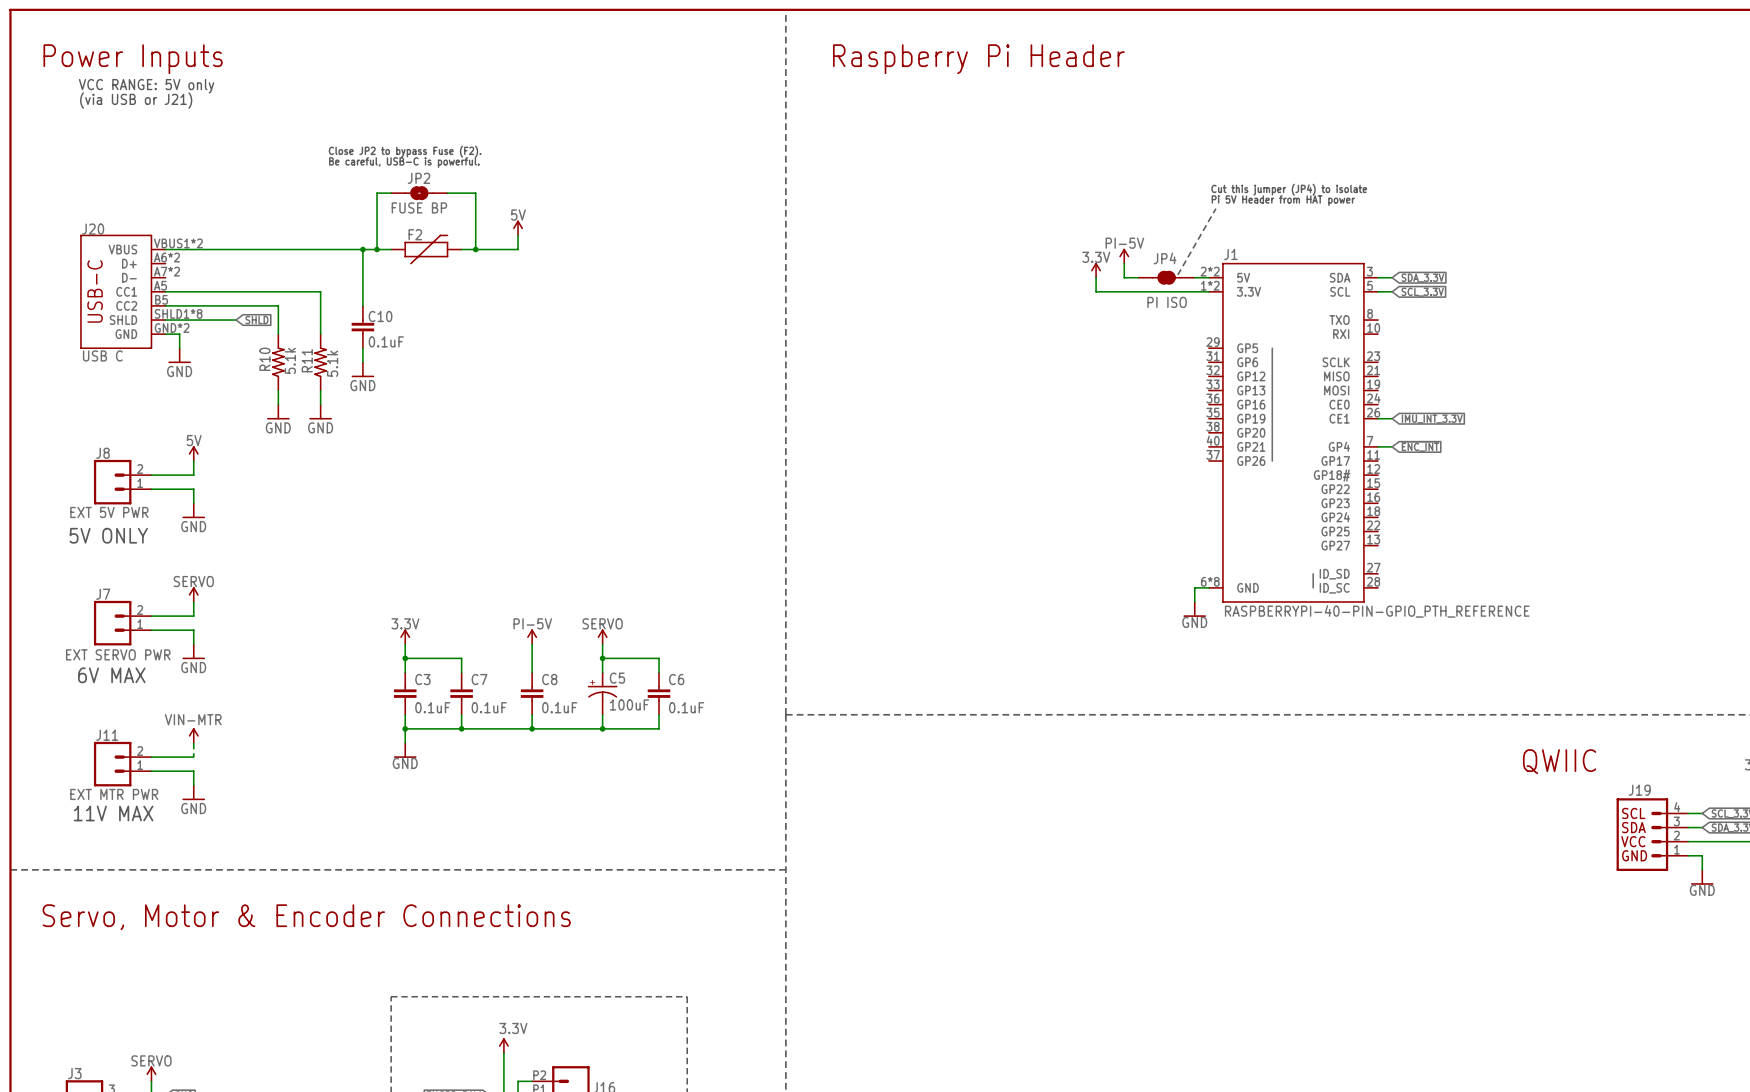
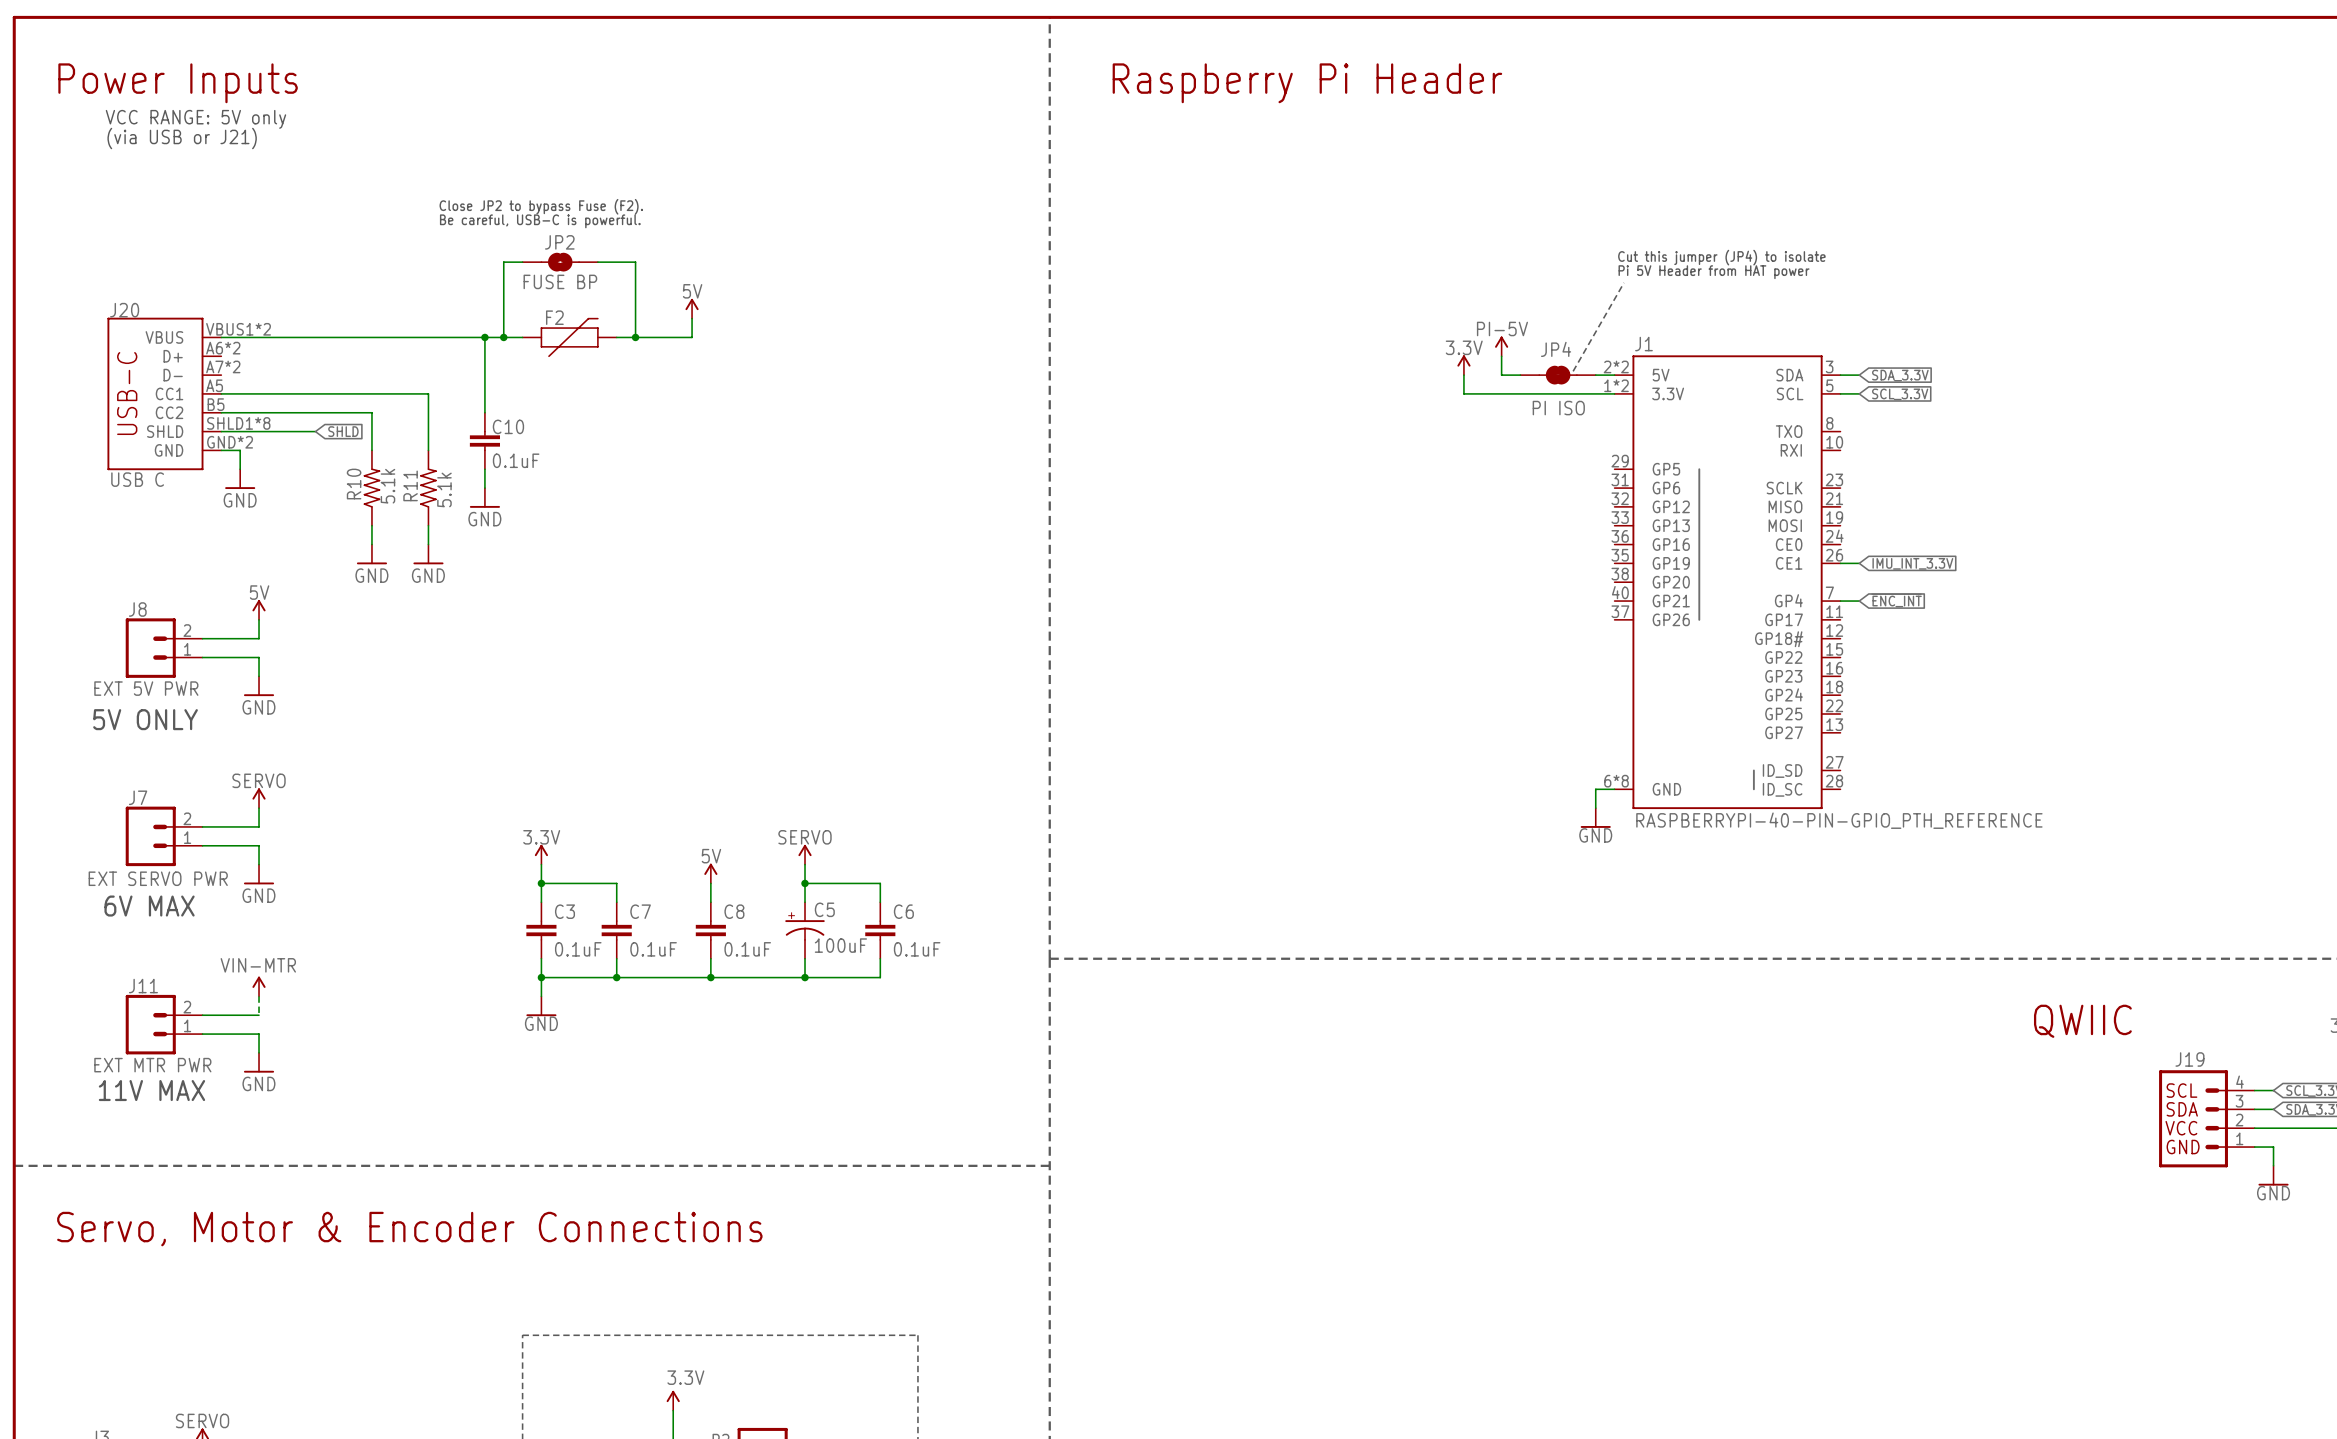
power symbol: PI-5V (532, 636) -> none
power symbol: none -> 5V (710, 873)

